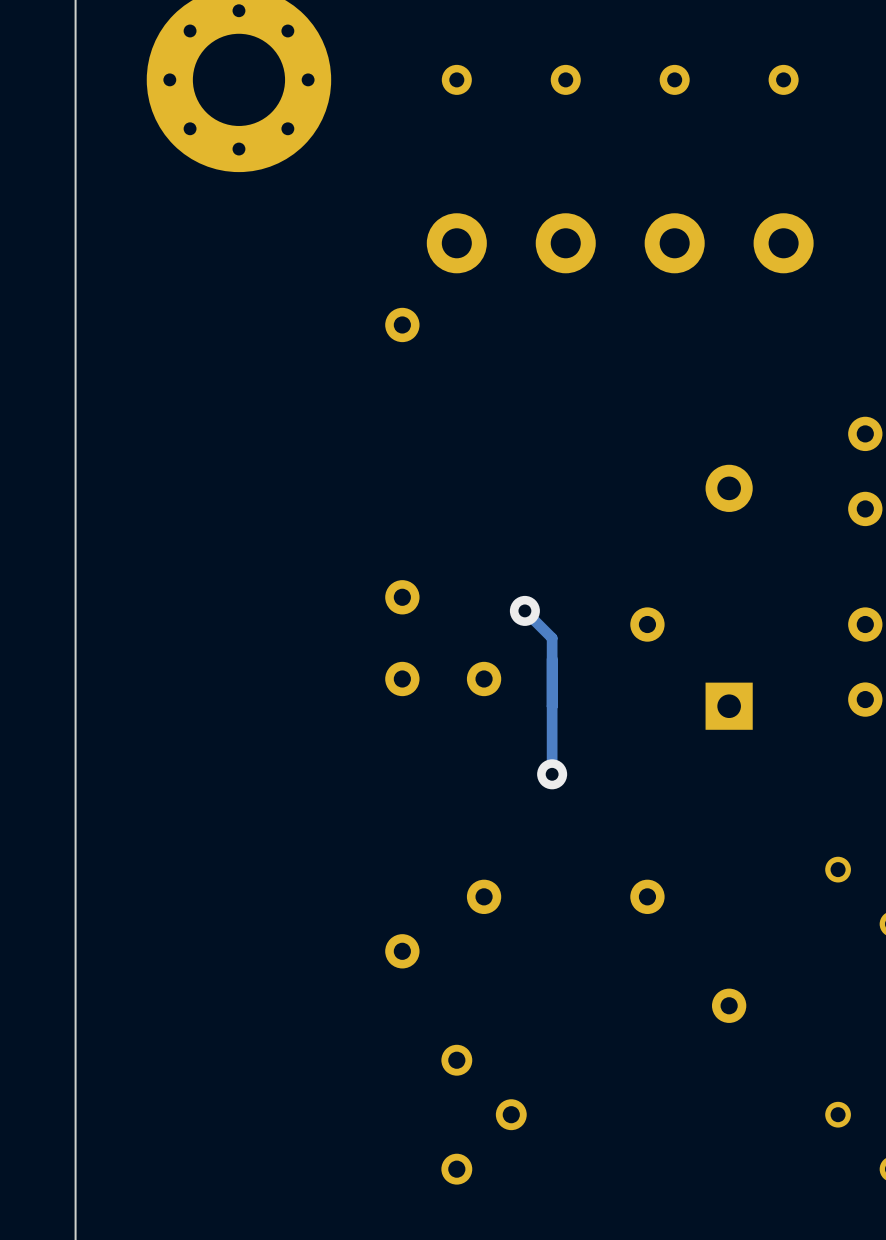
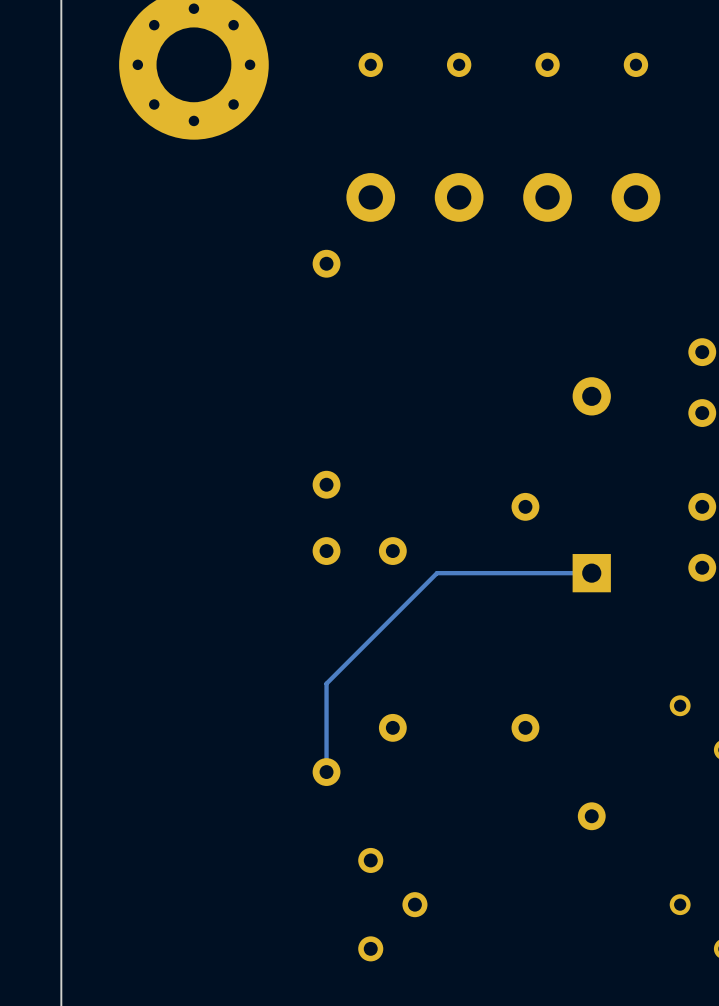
track: (524, 610) (552, 638) (552, 774) -> none
via: (524, 610) -> none
track: none -> (591, 573) (437, 573) (326, 683) (326, 772)
via: (552, 774) -> none

